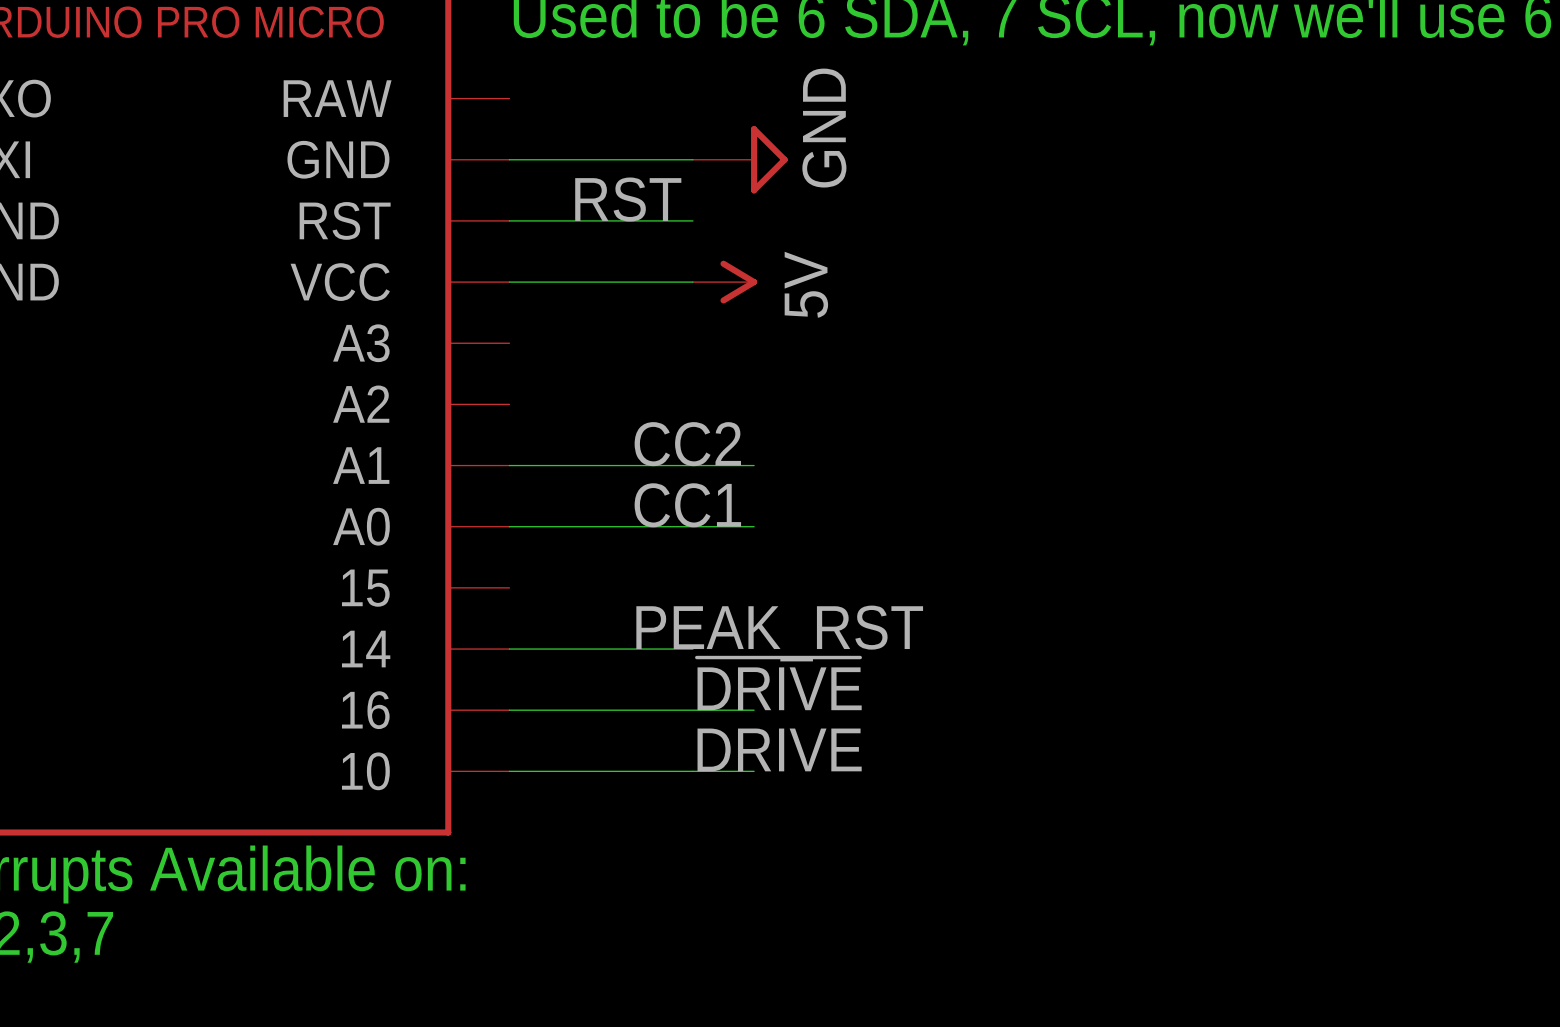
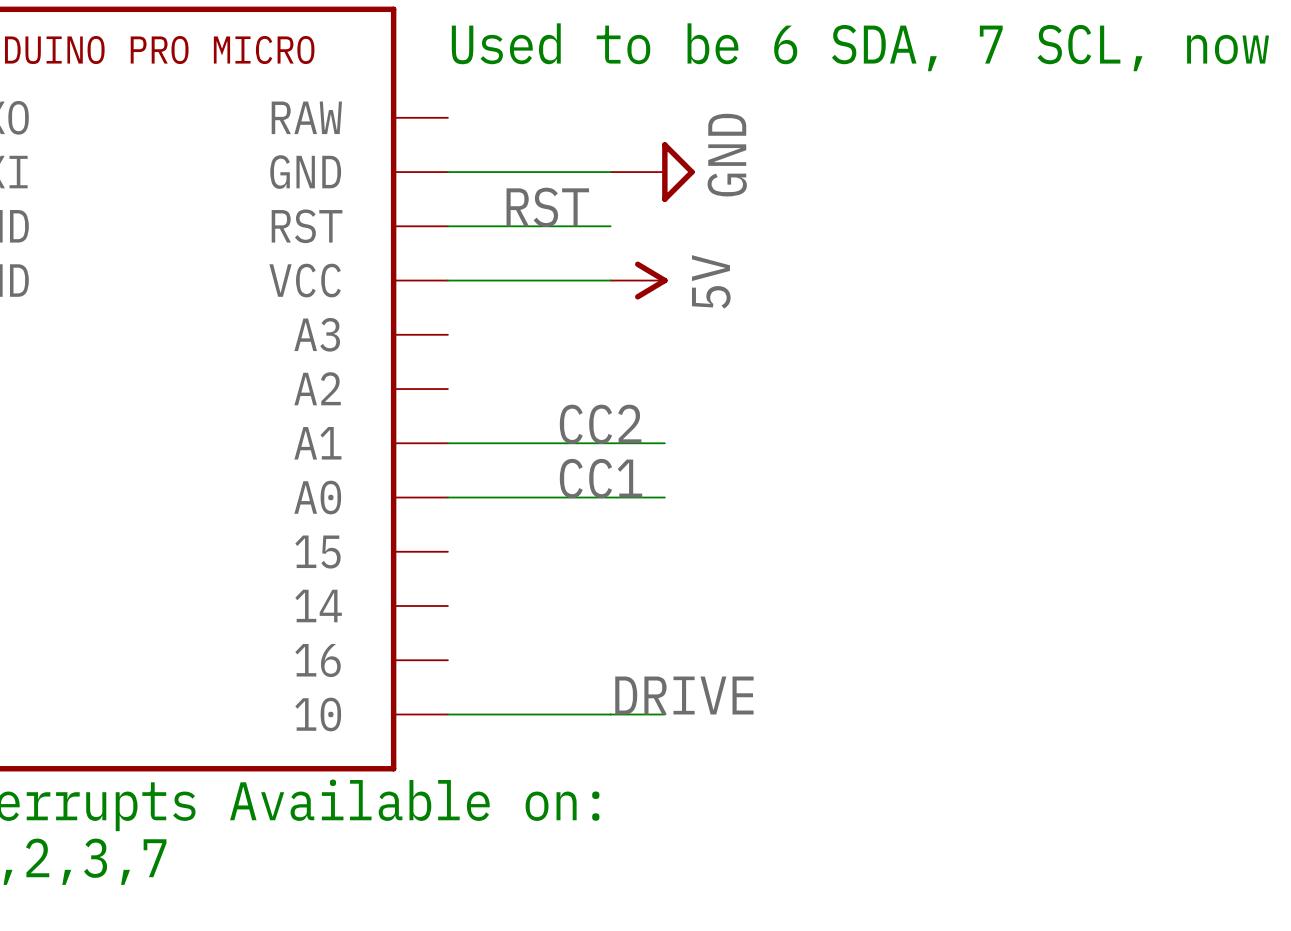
label: PEAK_RST (779, 633) -> none
wire: (509, 649) (692, 649) -> none
label: ~{DRIVE} (779, 683) -> none
wire: (509, 710) (754, 710) -> none

